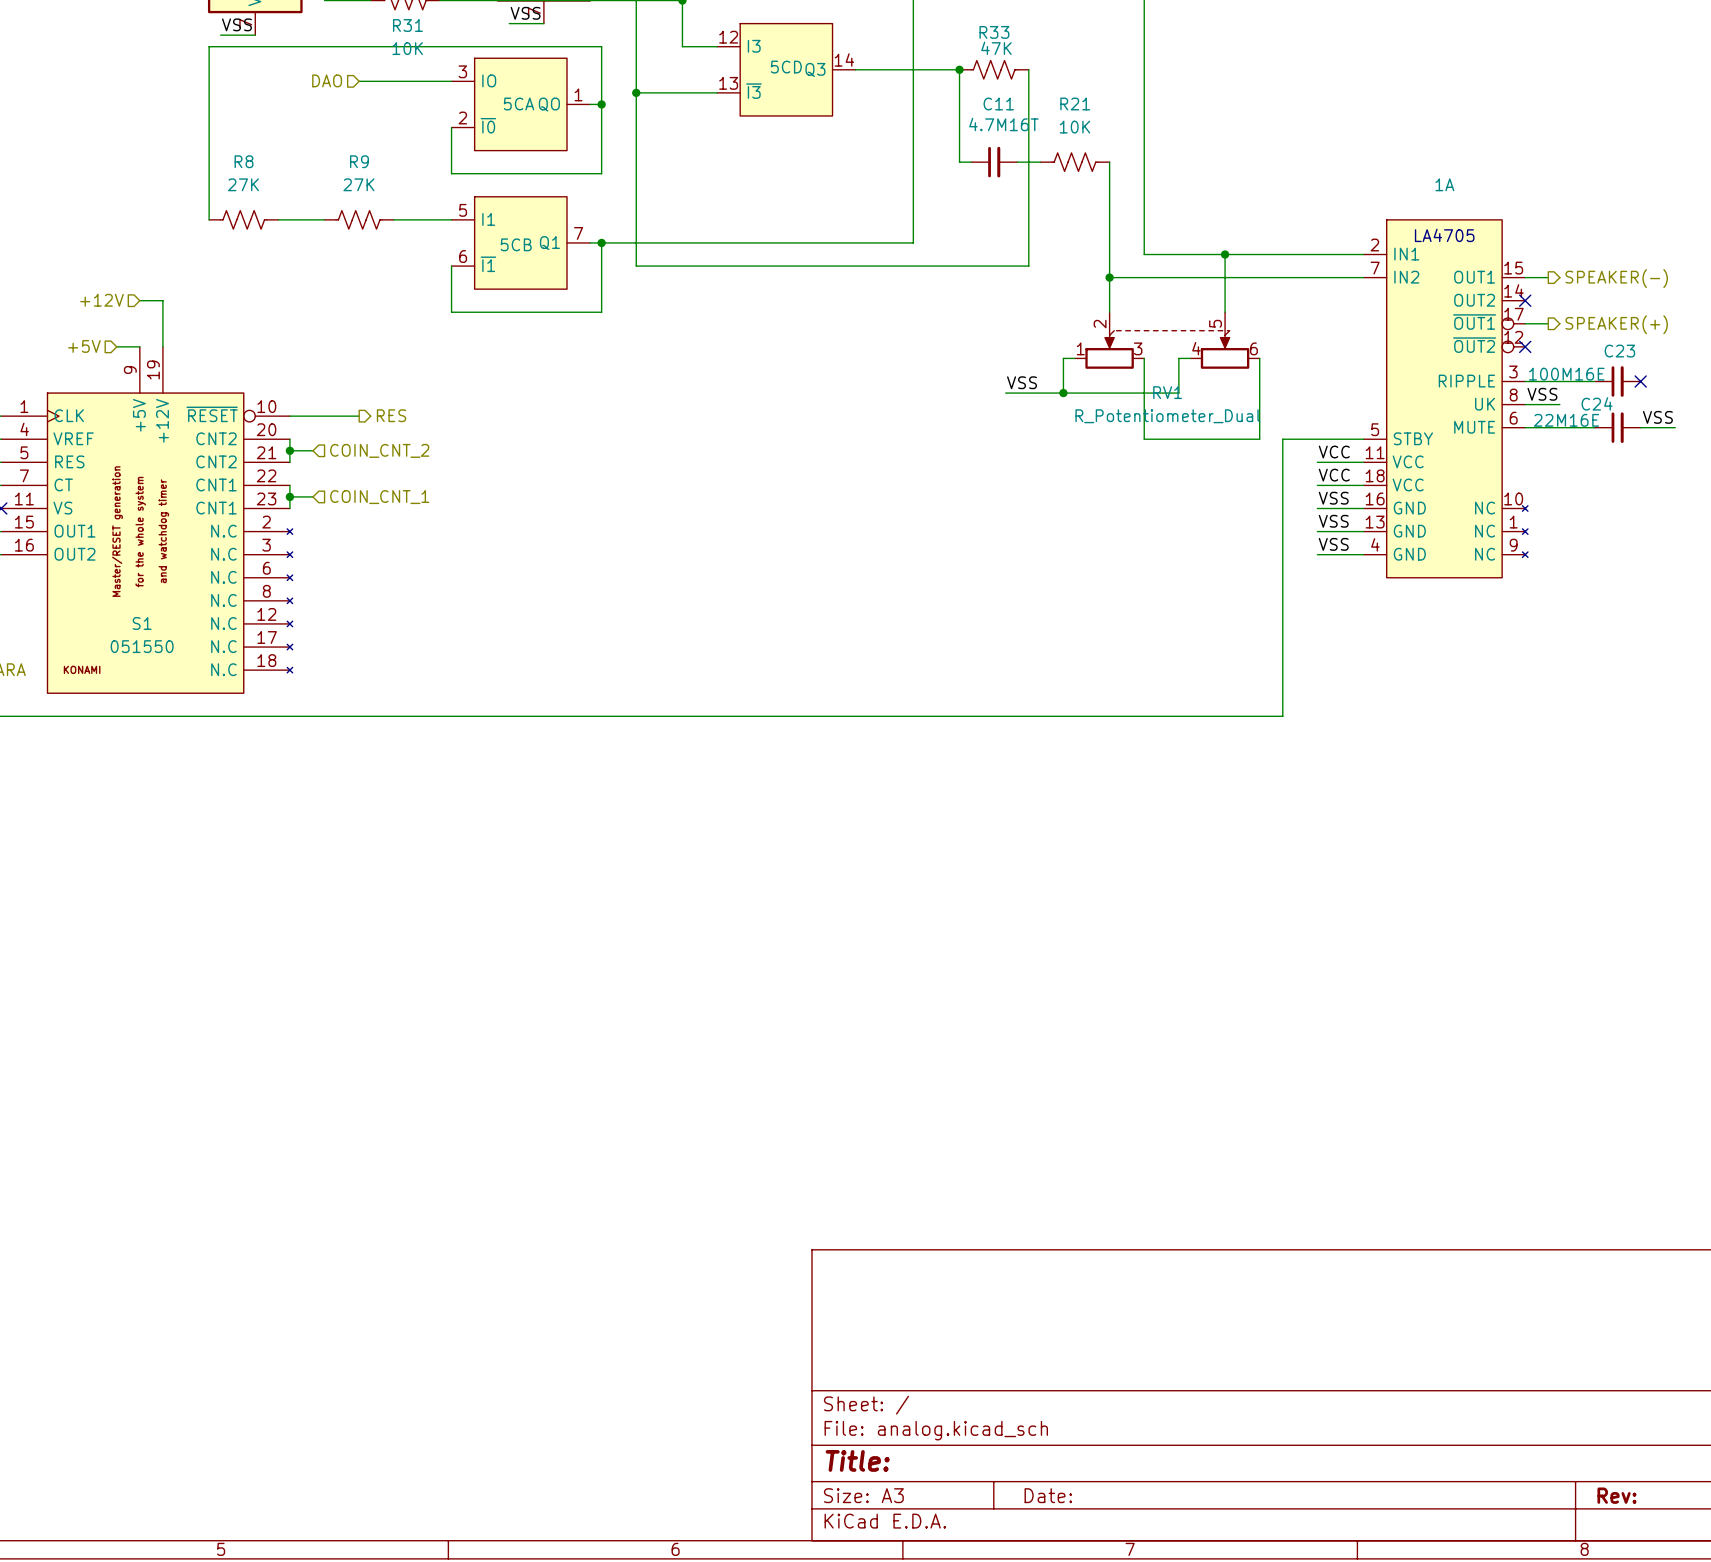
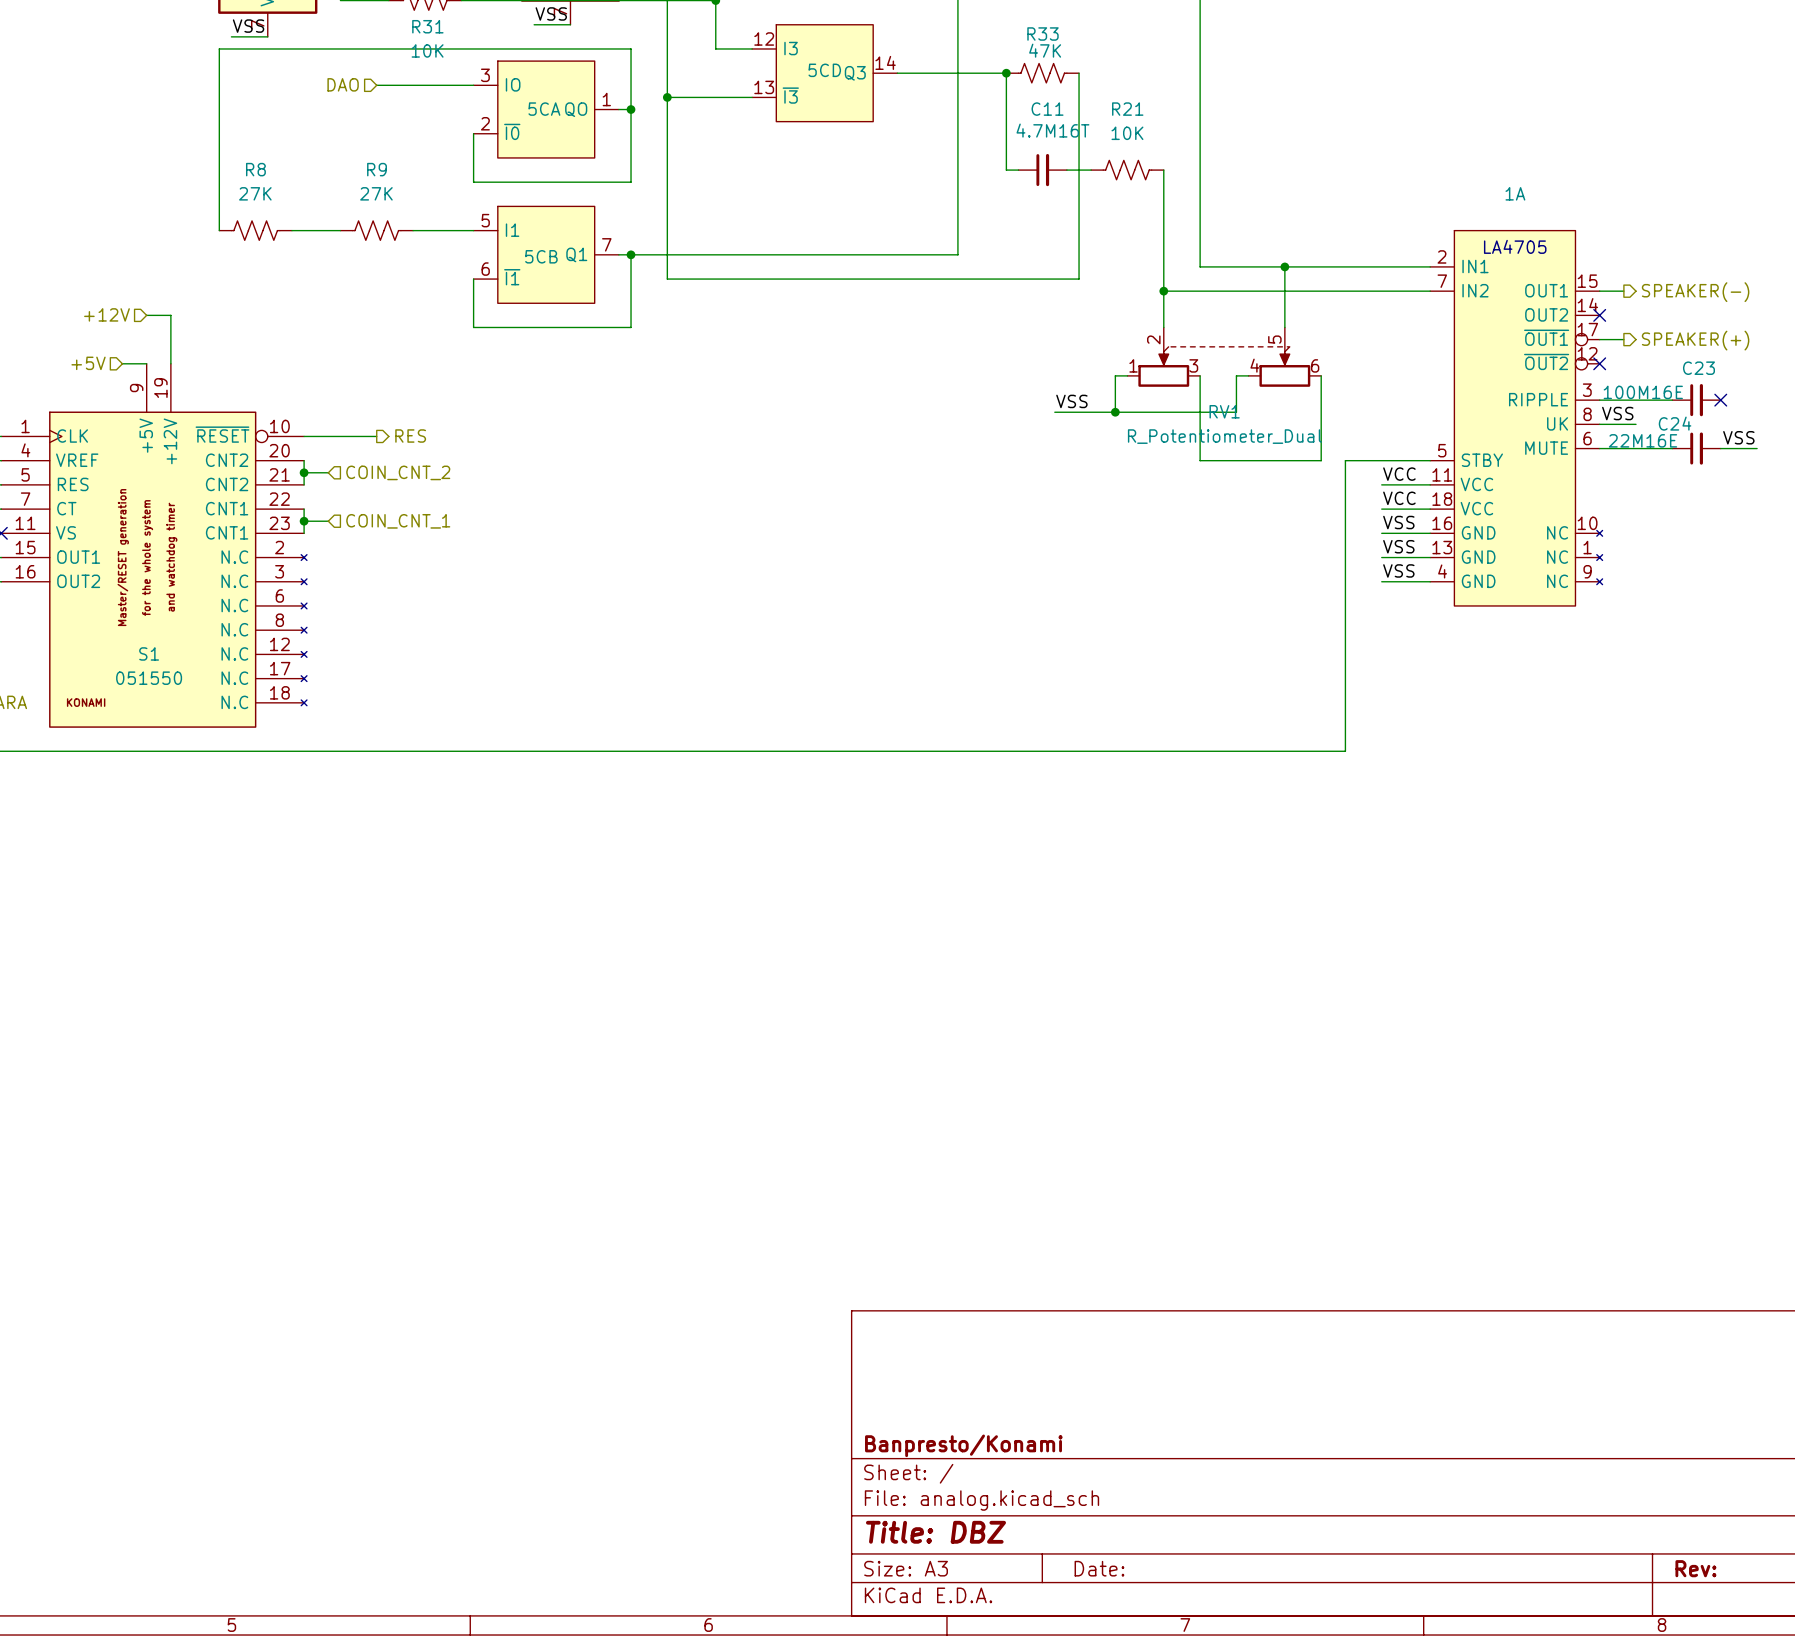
title block: none -> Banpresto/Konami (963, 1445)
title block: Title: (857, 1460) -> Title: DBZ (935, 1532)

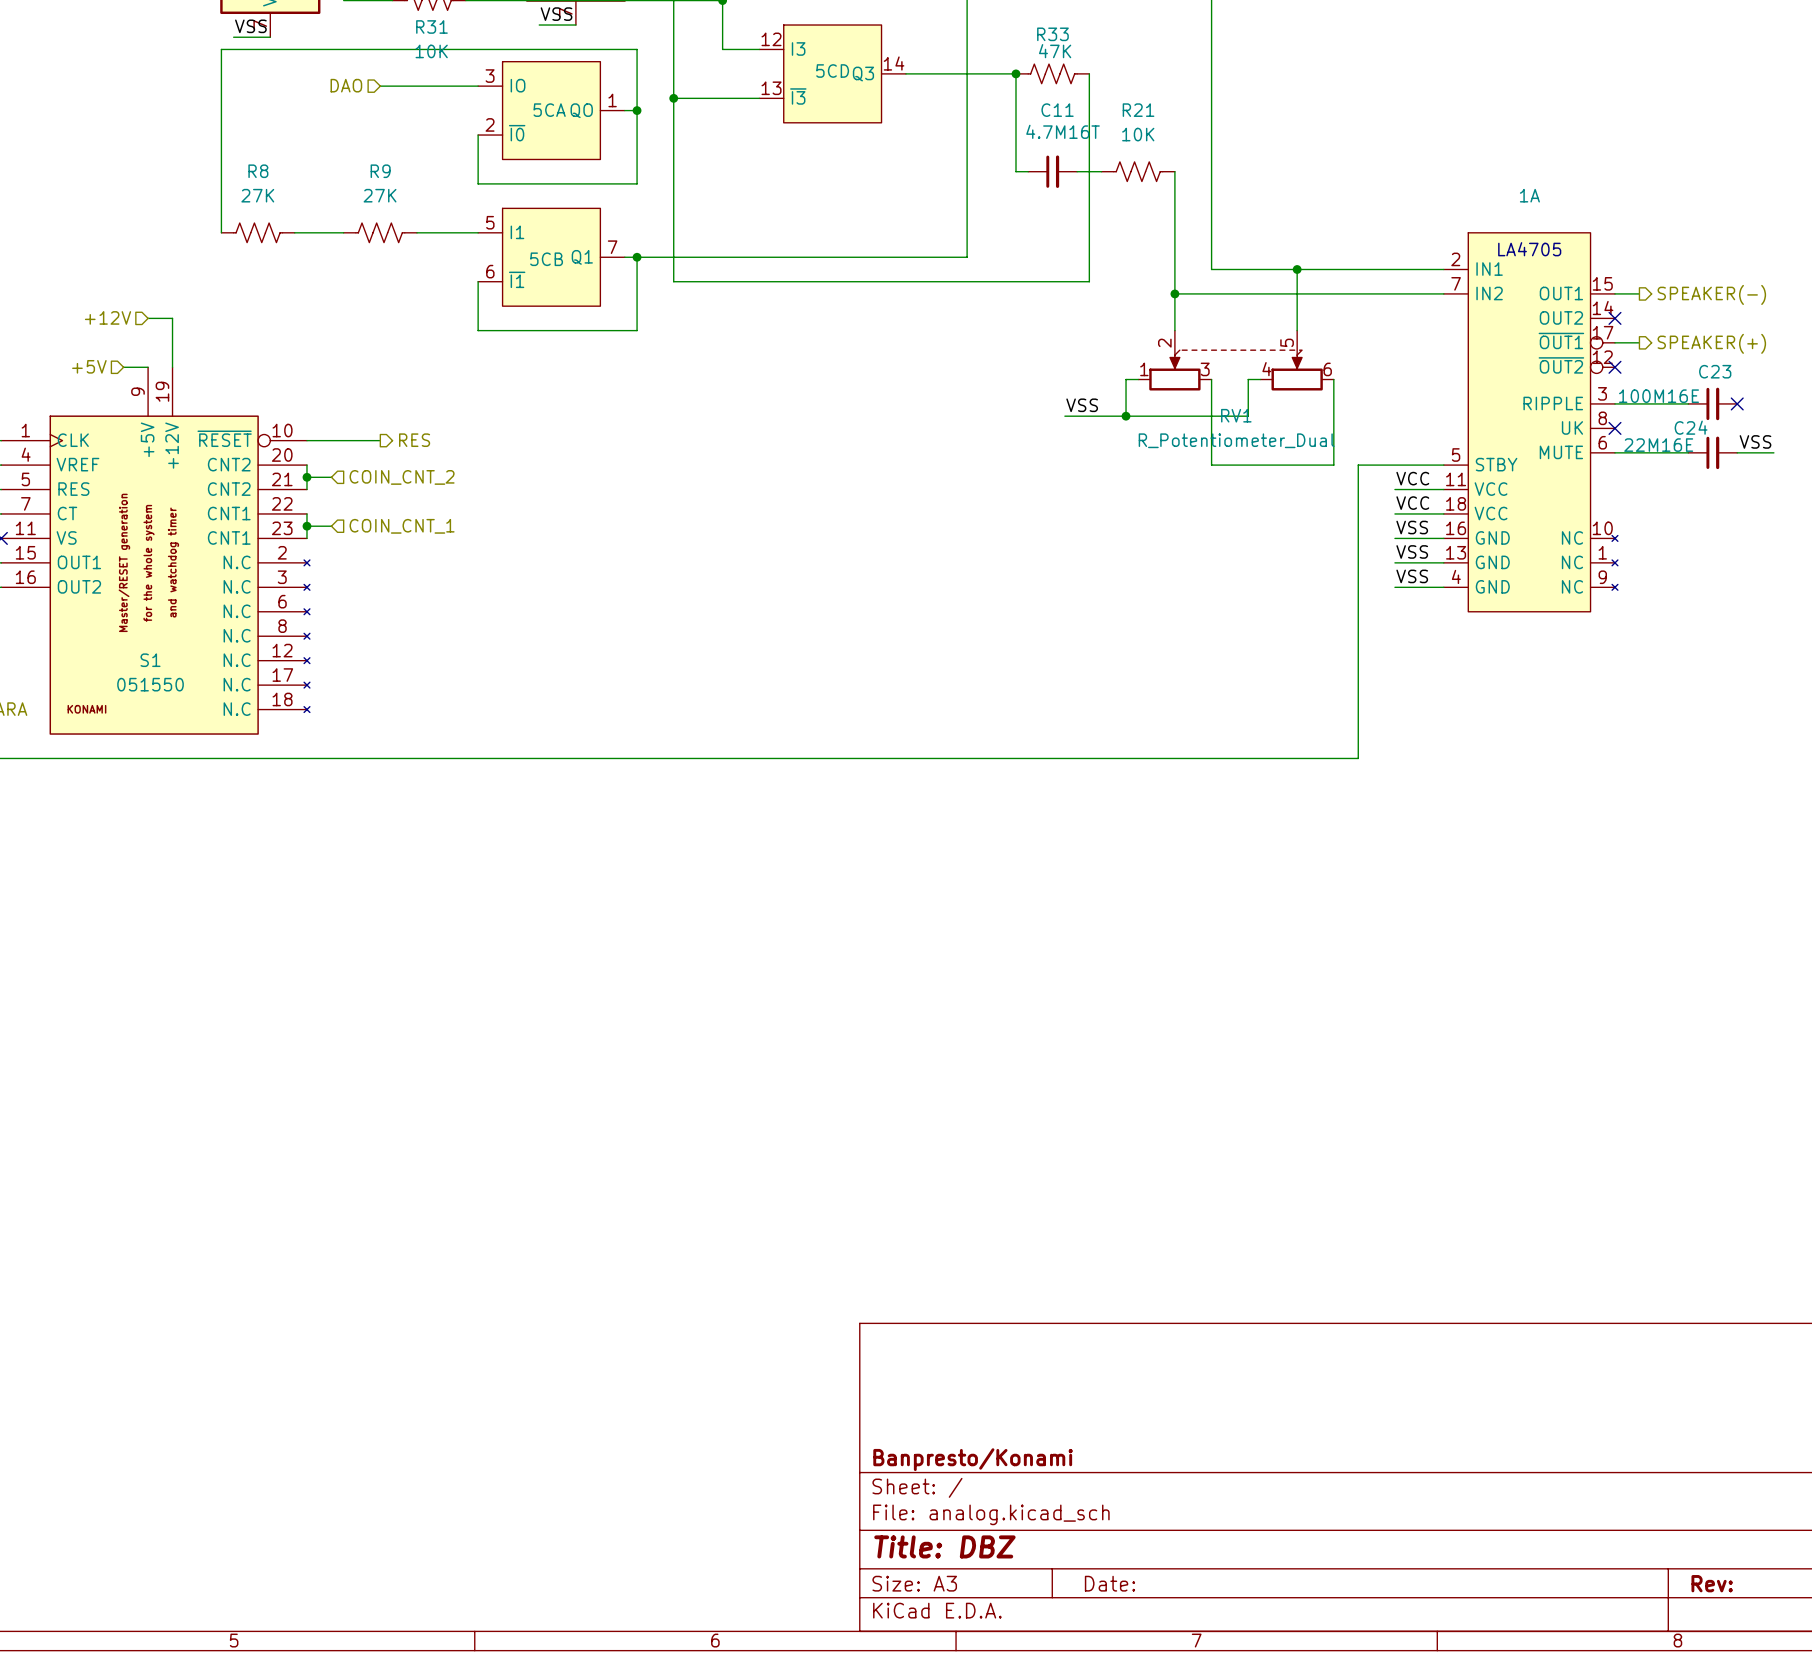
label: VSS (1617, 413) -> none
wire: (1599, 424) (1636, 424) -> none
no-connect mark: none -> (1614, 428)

